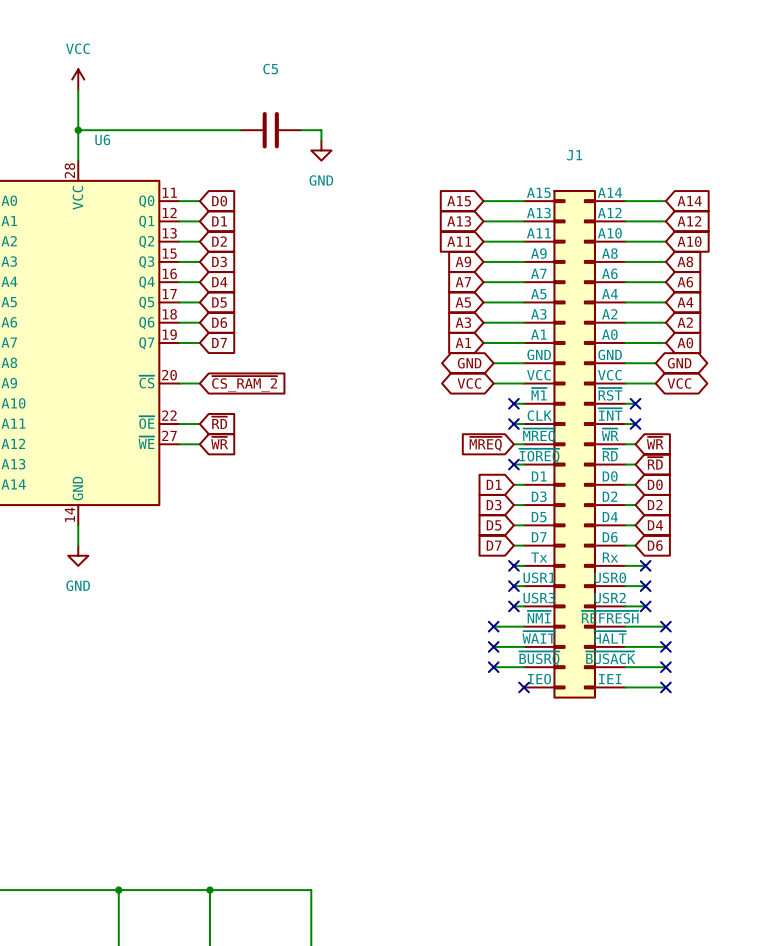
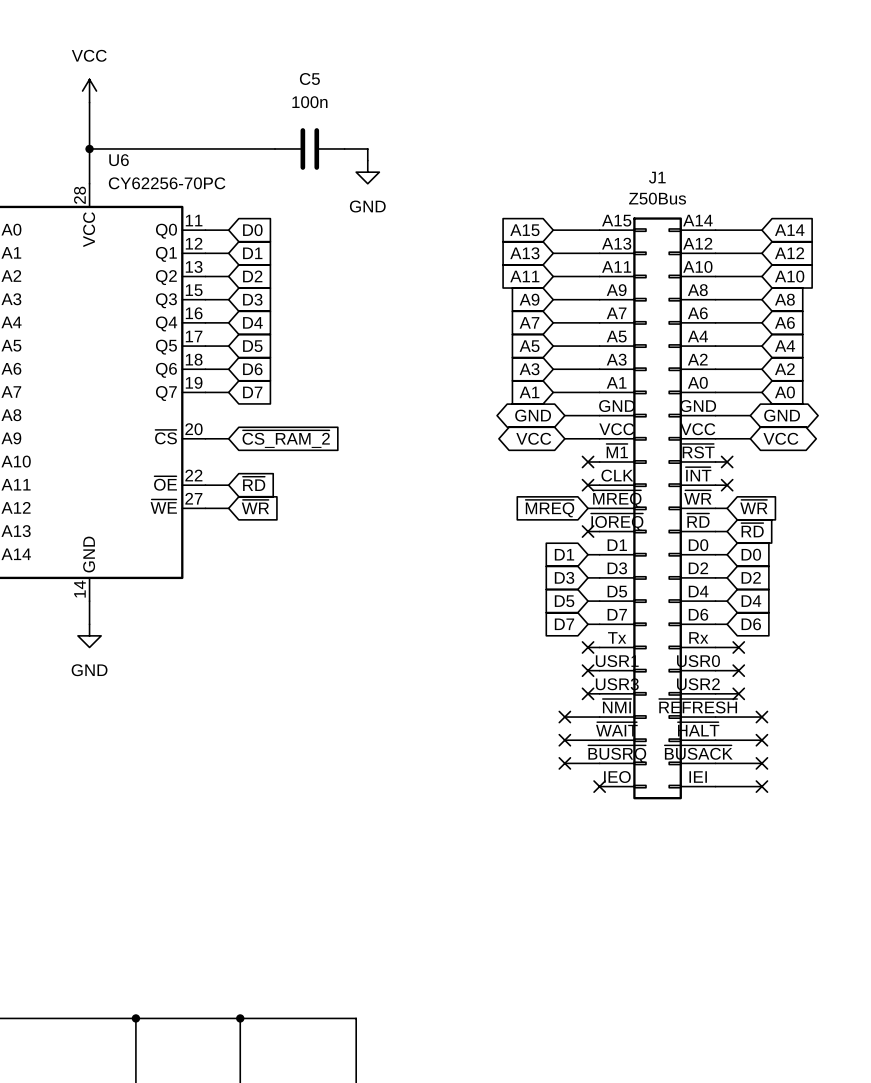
C5 value: none -> 100n (309, 102)
U6 value: none -> CY62256-70PC (167, 183)
J1 value: none -> Z50Bus (657, 198)

